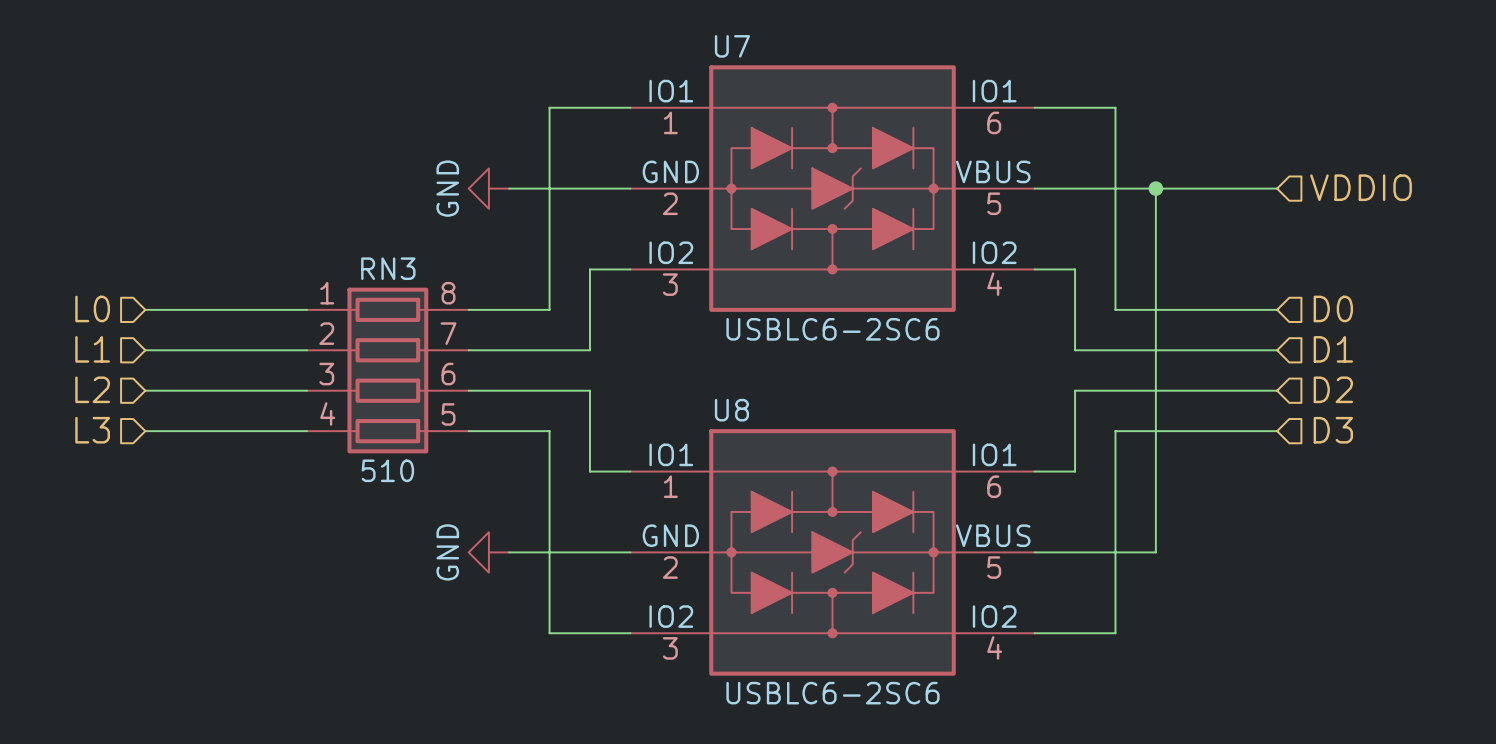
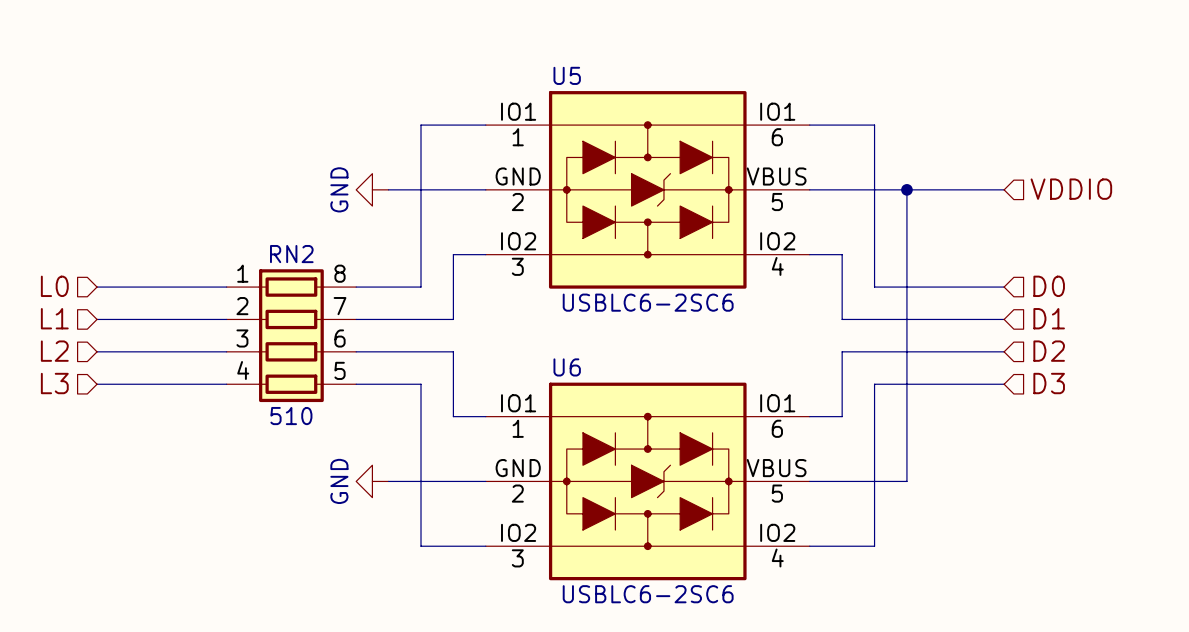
U7 name: U7 (732, 46) -> U5 (567, 75)
RN3 name: RN3 (388, 268) -> RN2 (291, 254)
U8 name: U8 (731, 410) -> U6 (567, 367)

